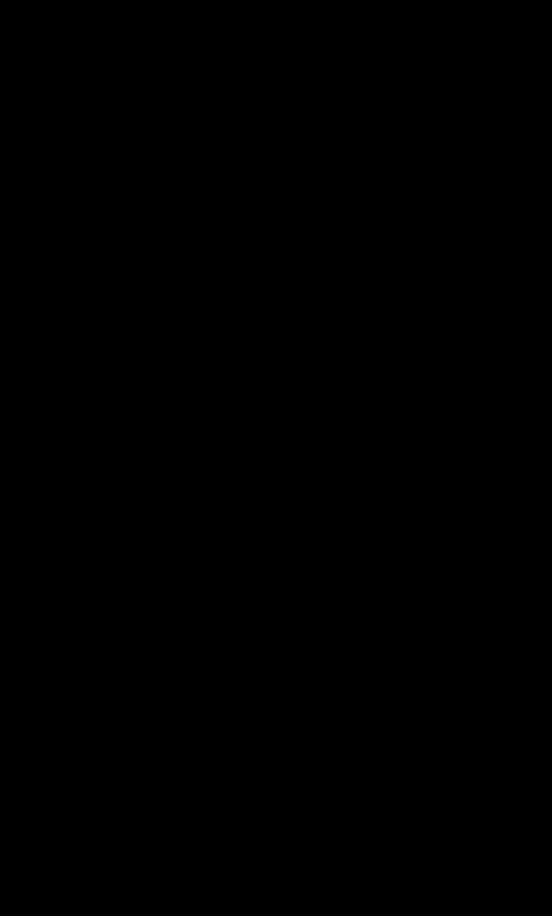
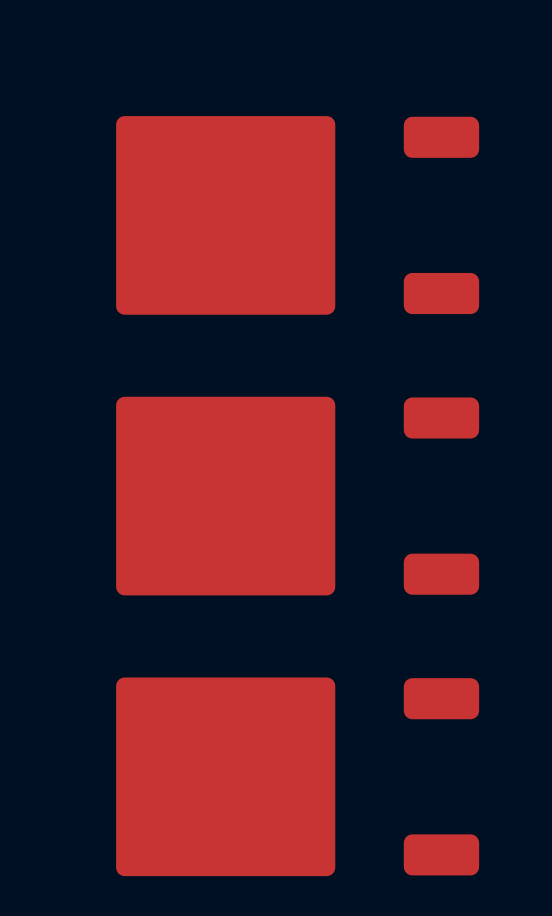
part: none -> (297, 215)
part: none -> (297, 496)
part: none -> (297, 776)

